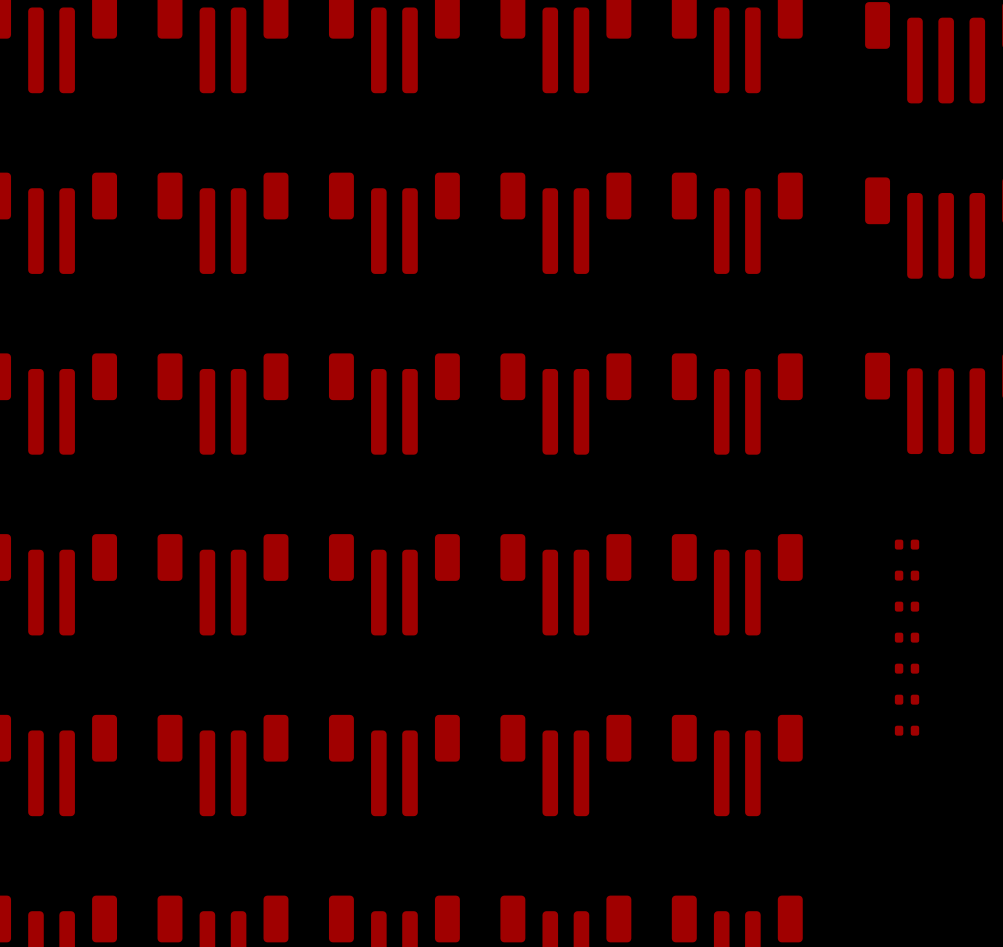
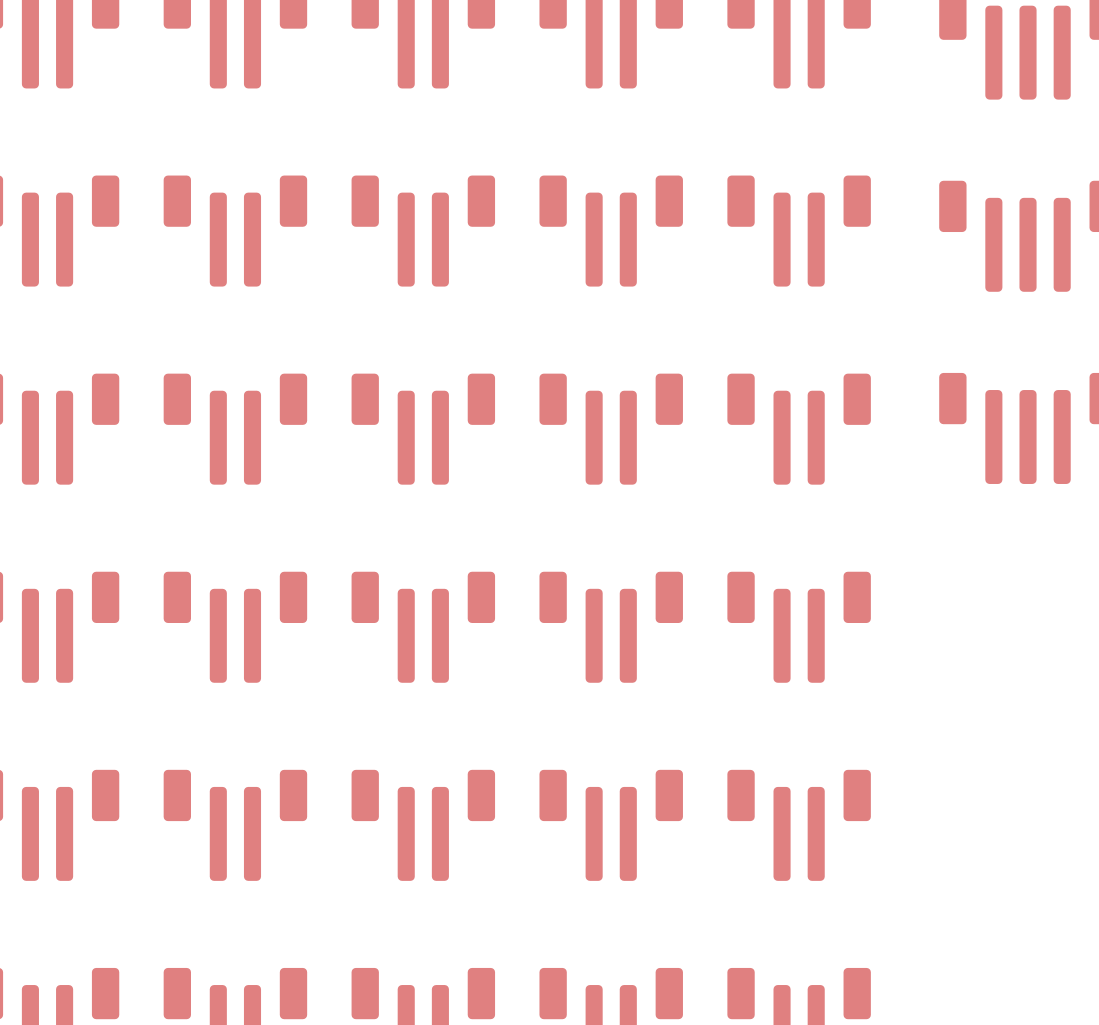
part: (907, 544) -> none
part: (907, 575) -> none
part: (907, 606) -> none
part: (907, 637) -> none
part: (907, 668) -> none
part: (907, 699) -> none
part: (907, 730) -> none

